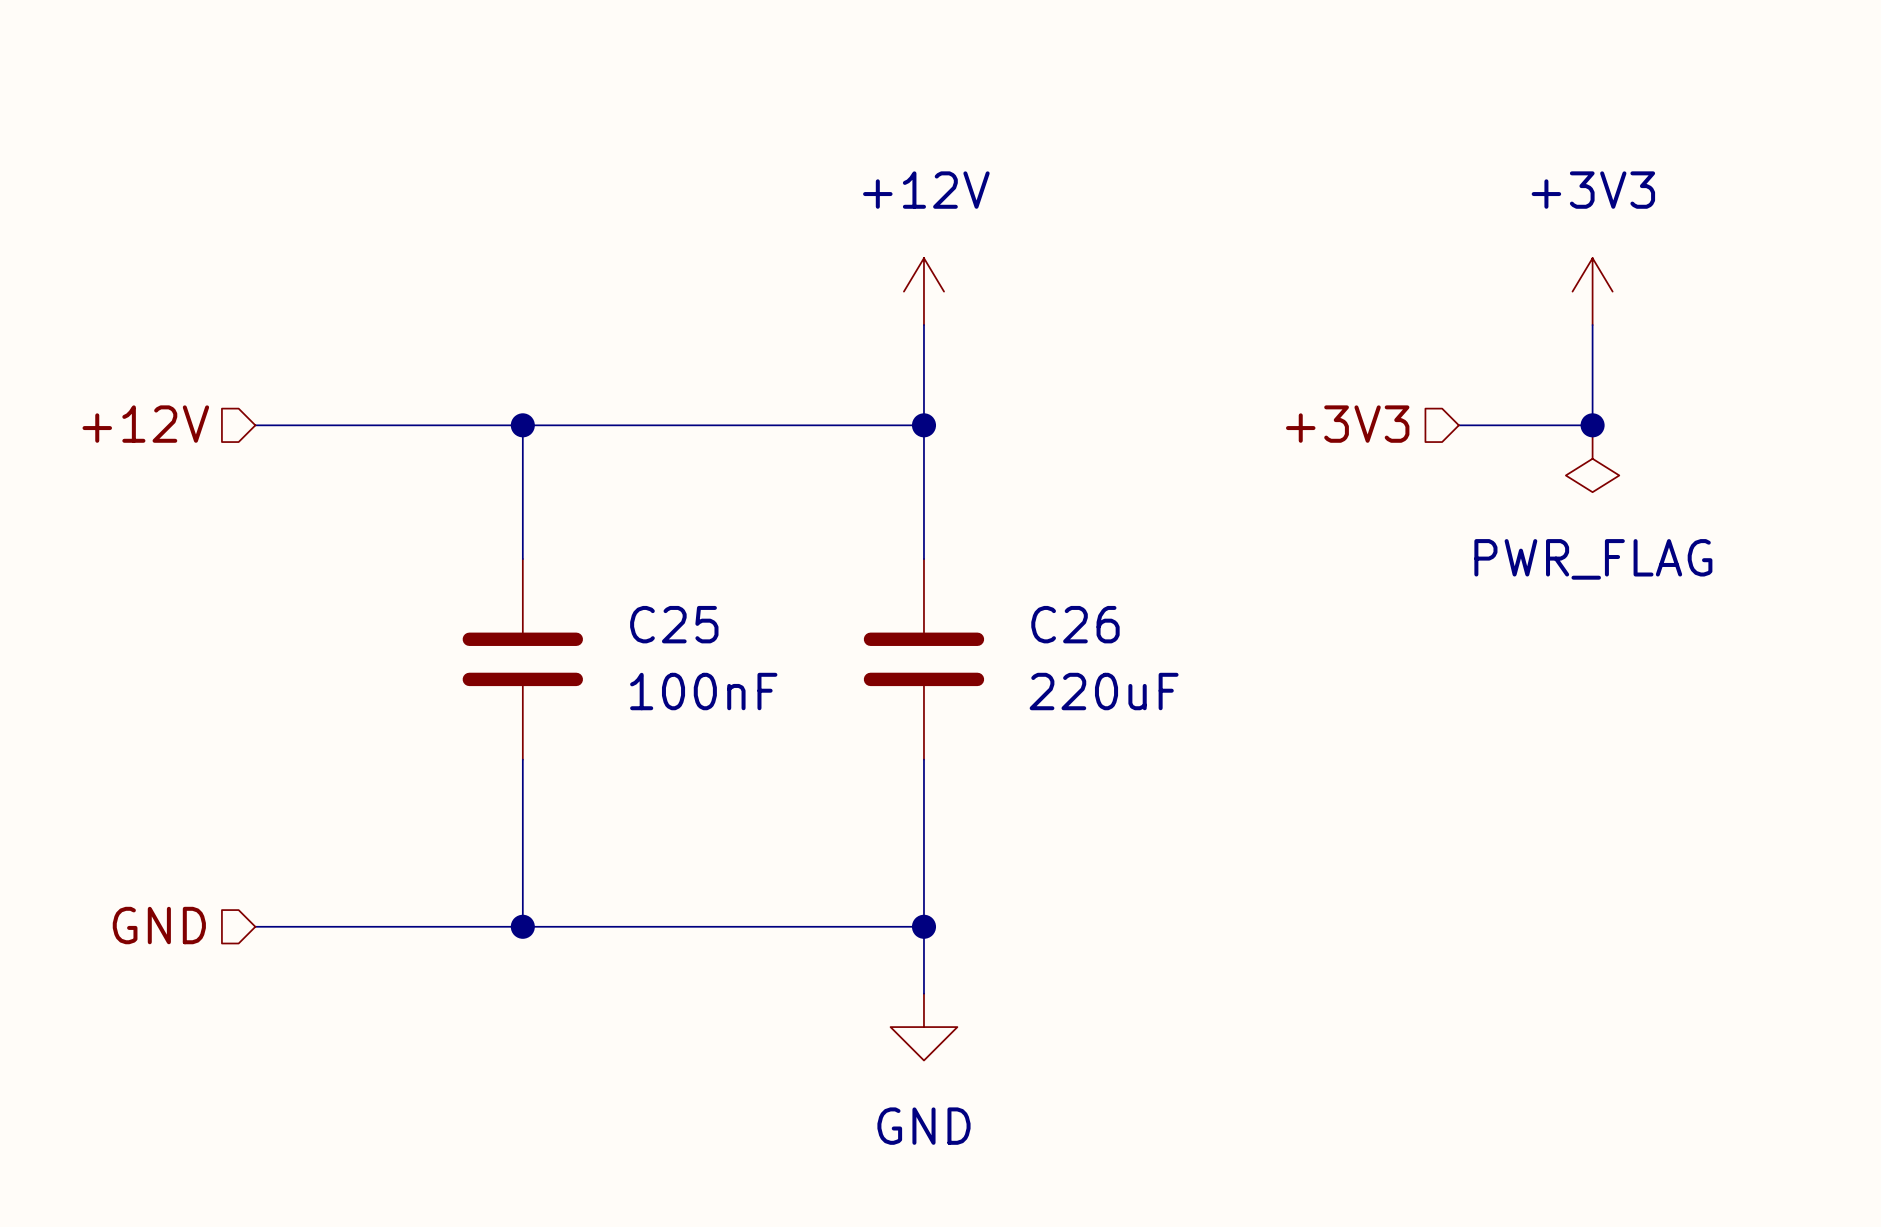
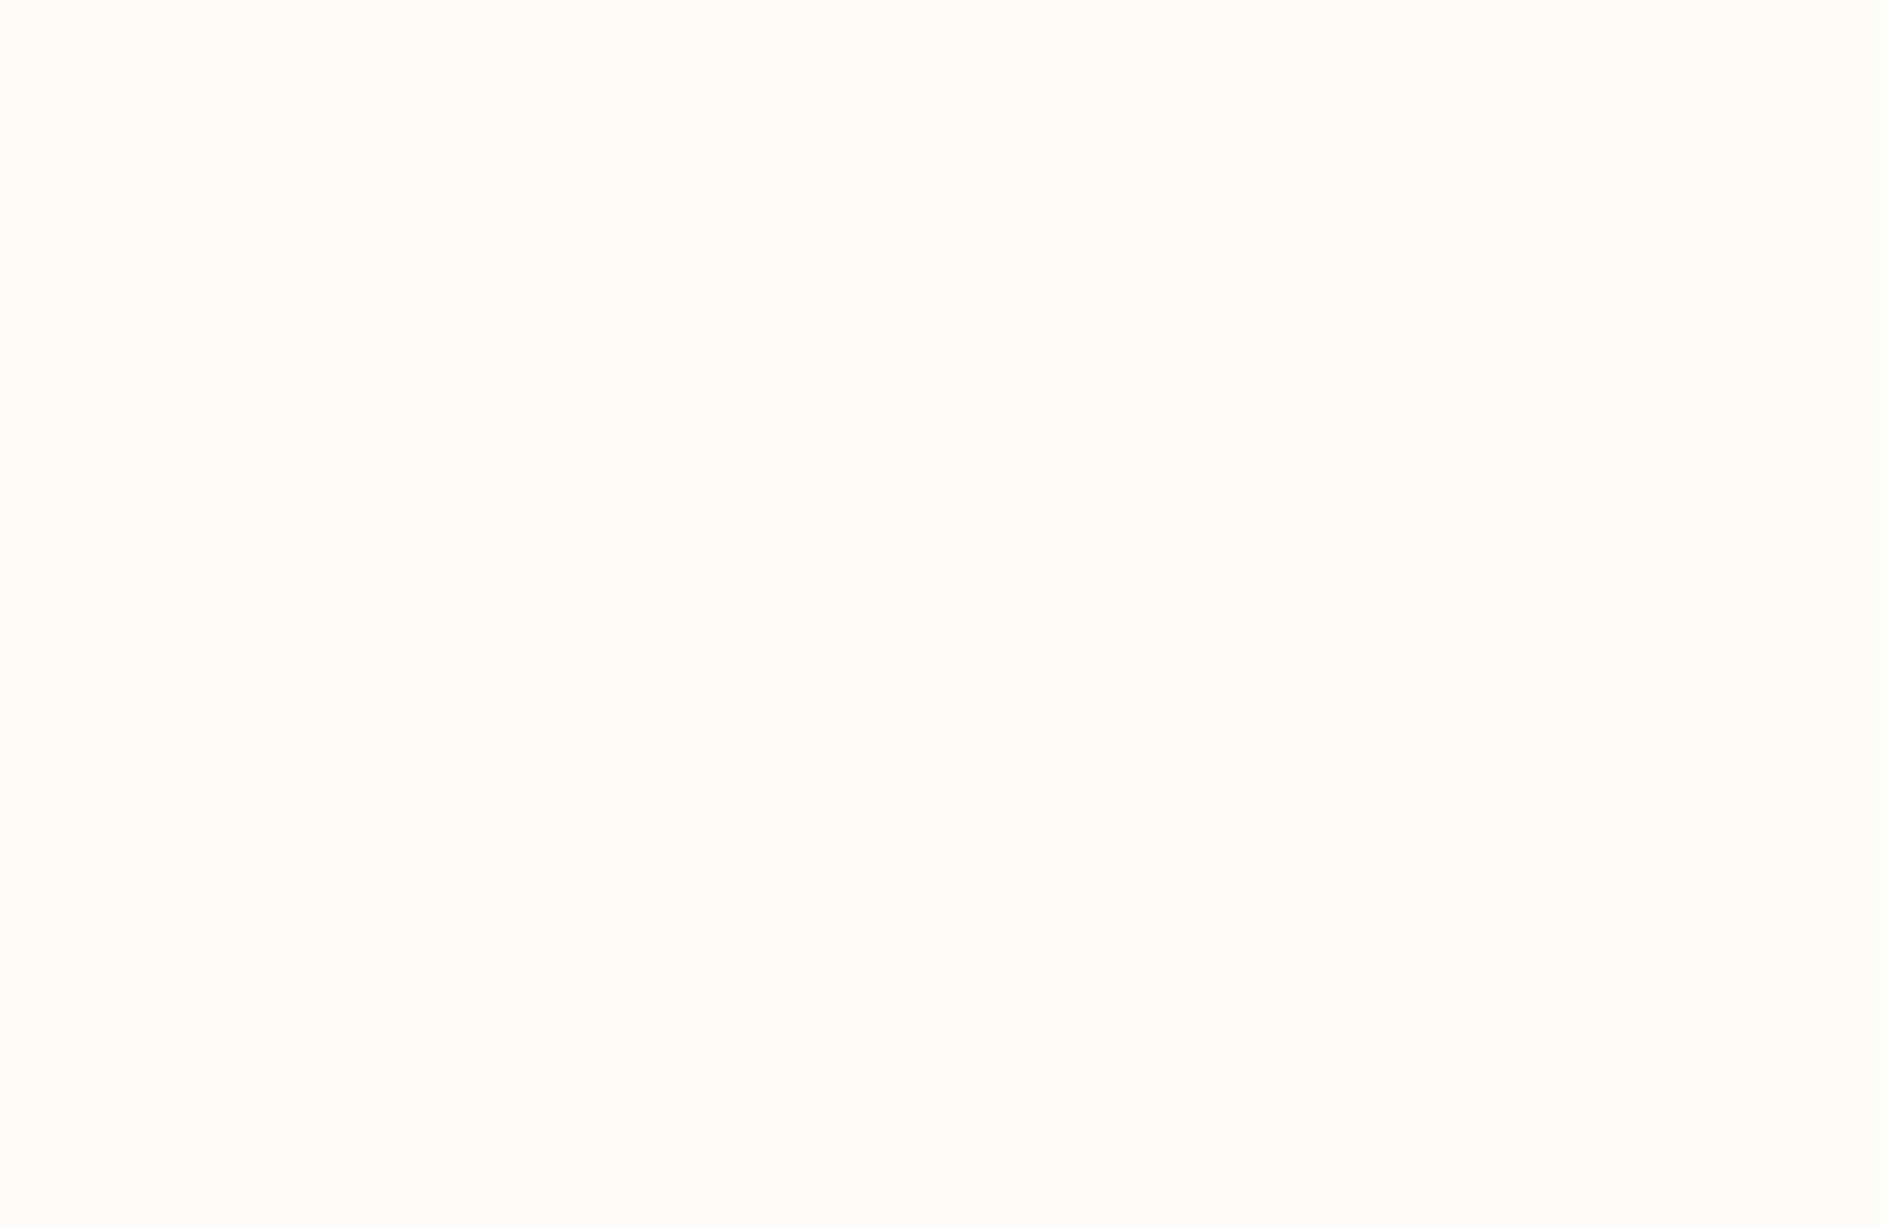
power symbol: +12V (923, 291) -> none
power symbol: +3V3 (1592, 291) -> none
wire: (923, 325) (923, 559) -> none
wire: (1592, 325) (1592, 425) (1458, 425) -> none
hierarchical label: +12V (145, 424) -> none
hierarchical label: +3V3 (1347, 424) -> none
wire: (255, 425) (923, 425) -> none
wire: (522, 425) (522, 559) -> none
junction: (522, 425) -> none
junction: (923, 425) -> none
junction: (1592, 425) -> none
power symbol: PWR_FLAG (1592, 458) -> none
C25: 100nF (522, 659) -> none
C26: 220uF (923, 659) -> none
wire: (522, 759) (522, 926) -> none
wire: (923, 759) (923, 993) -> none
hierarchical label: GND (159, 925) -> none
wire: (255, 926) (923, 926) -> none
junction: (522, 926) -> none
junction: (923, 926) -> none
power symbol: GND (923, 1027) -> none

